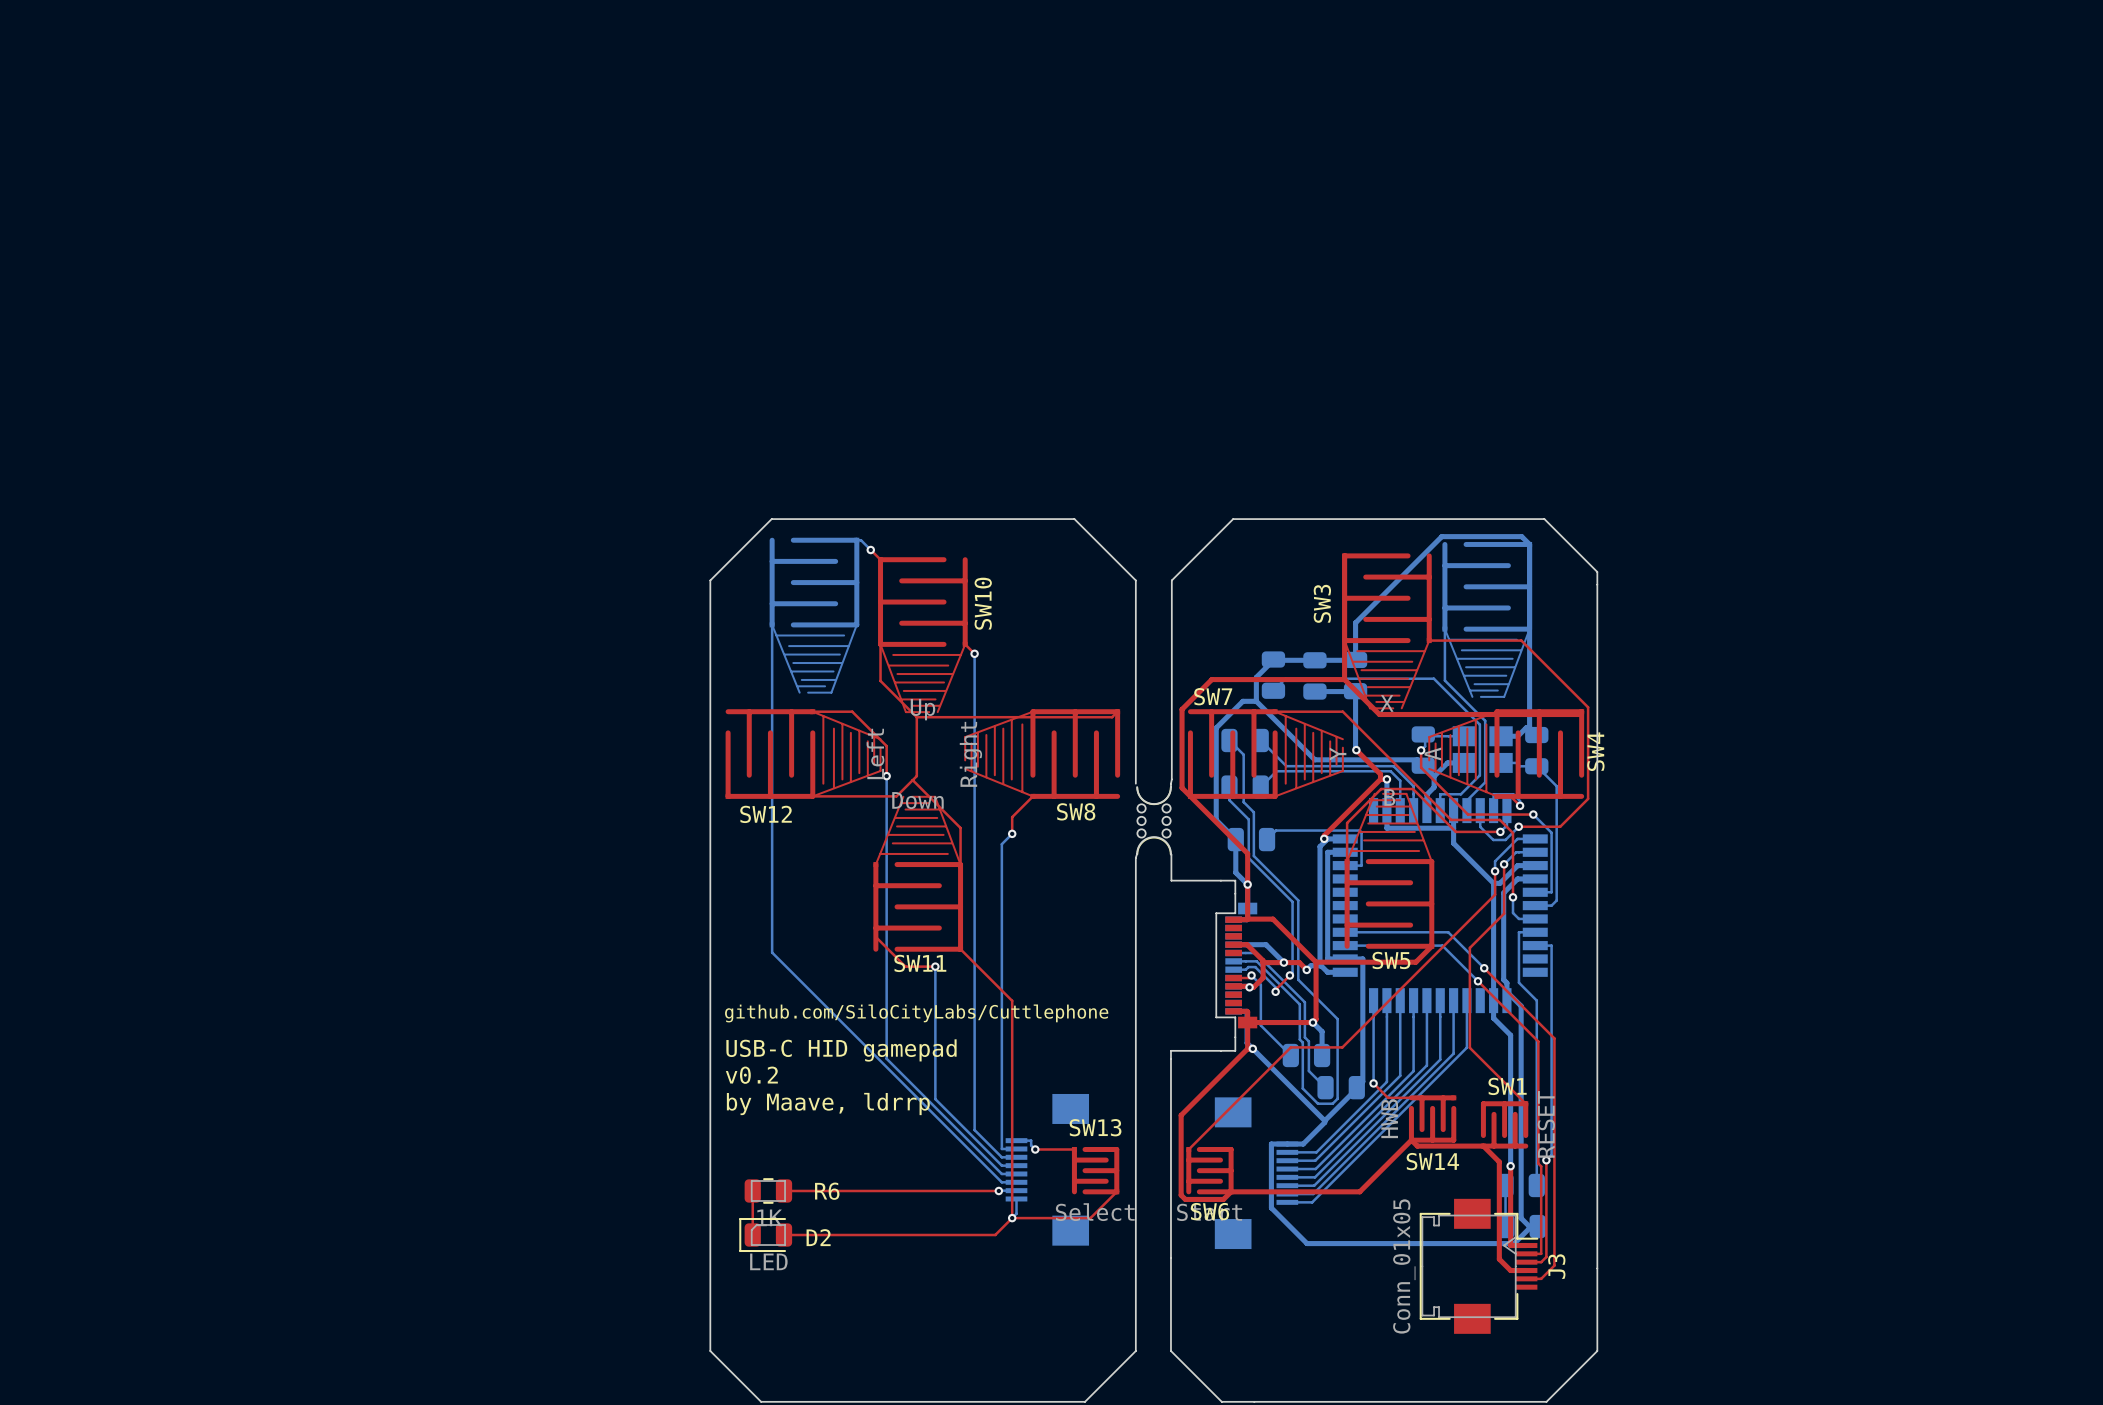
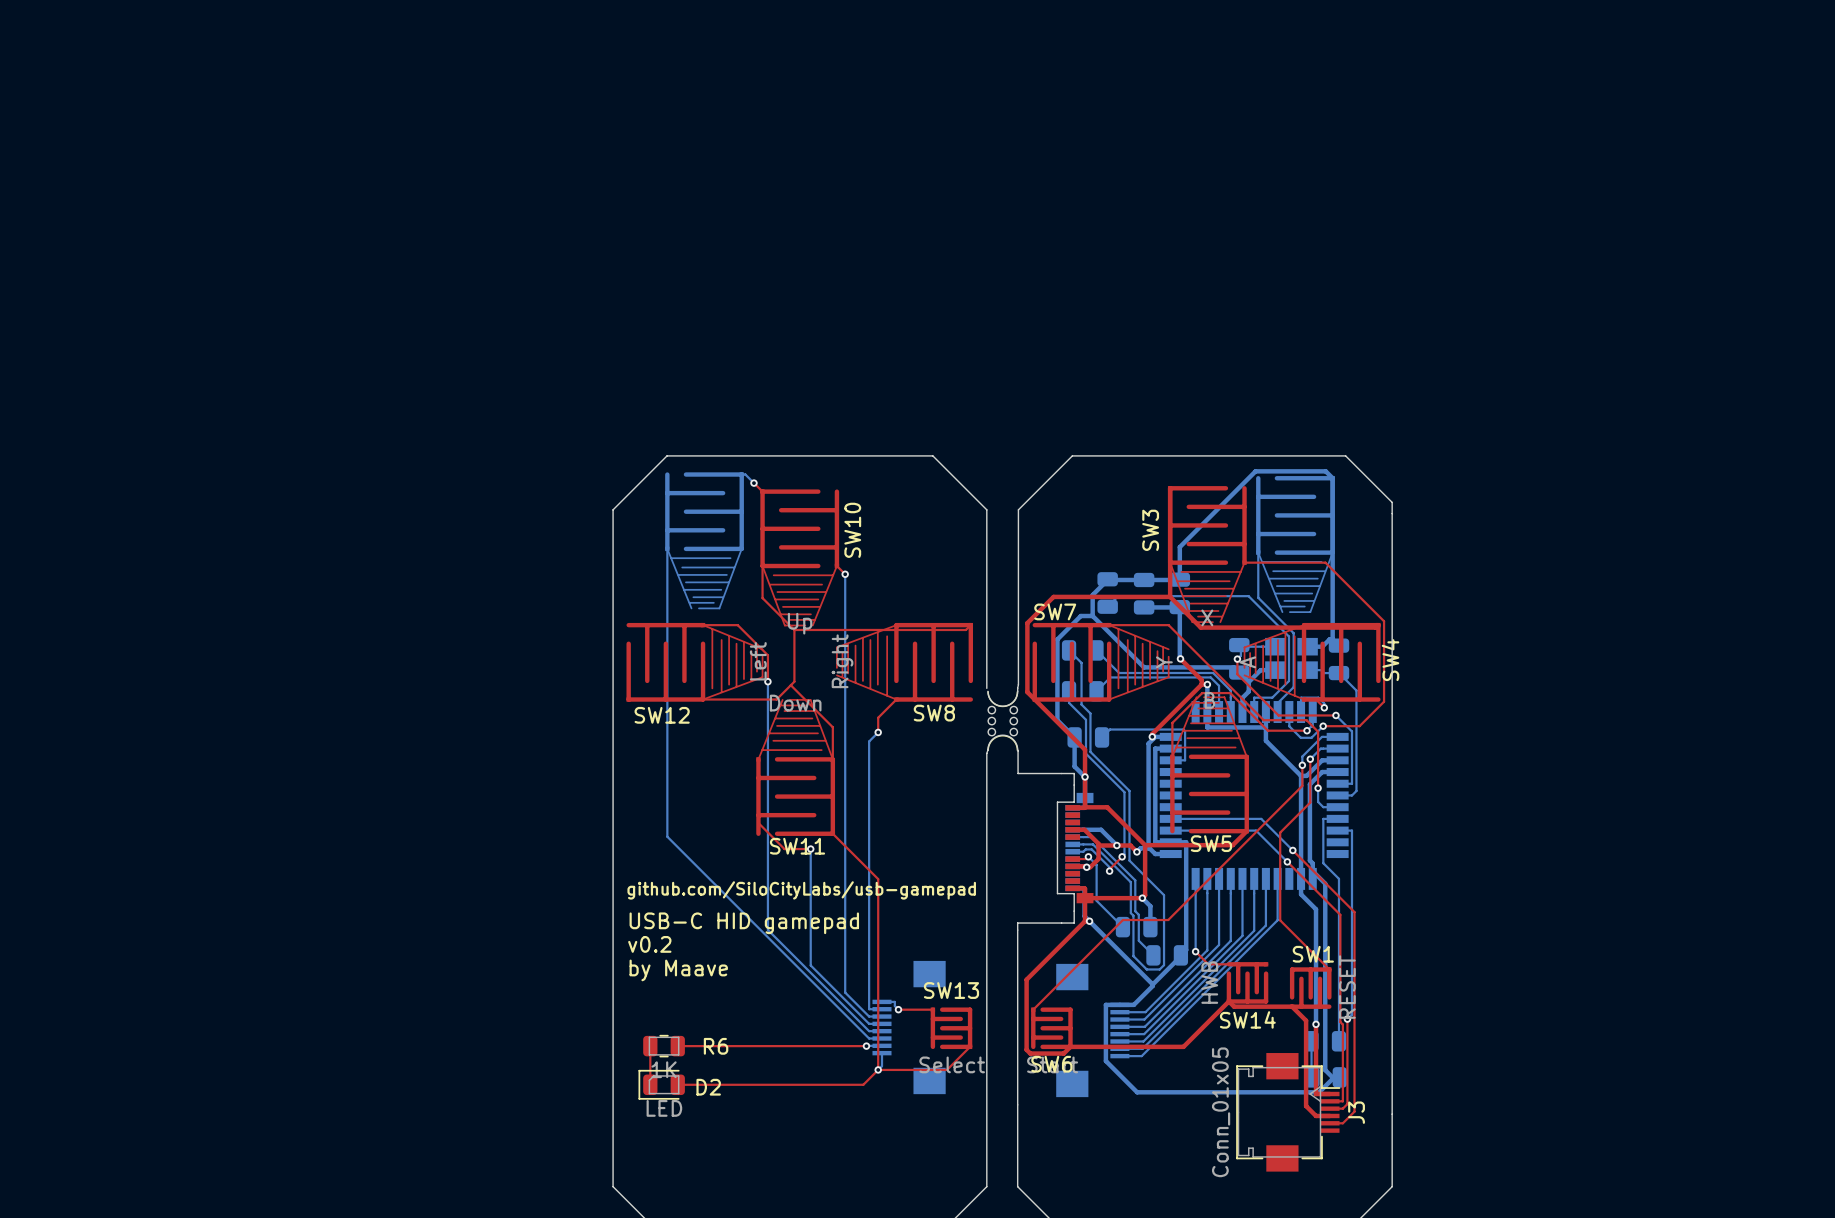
text: github.com/SiloCityLabs/Cuttlephone (916, 1013) -> github.com/SiloCityLabs/usb-gamepad (801, 890)
text: by Maave, ldrrp (828, 1104) -> by Maave (678, 970)

